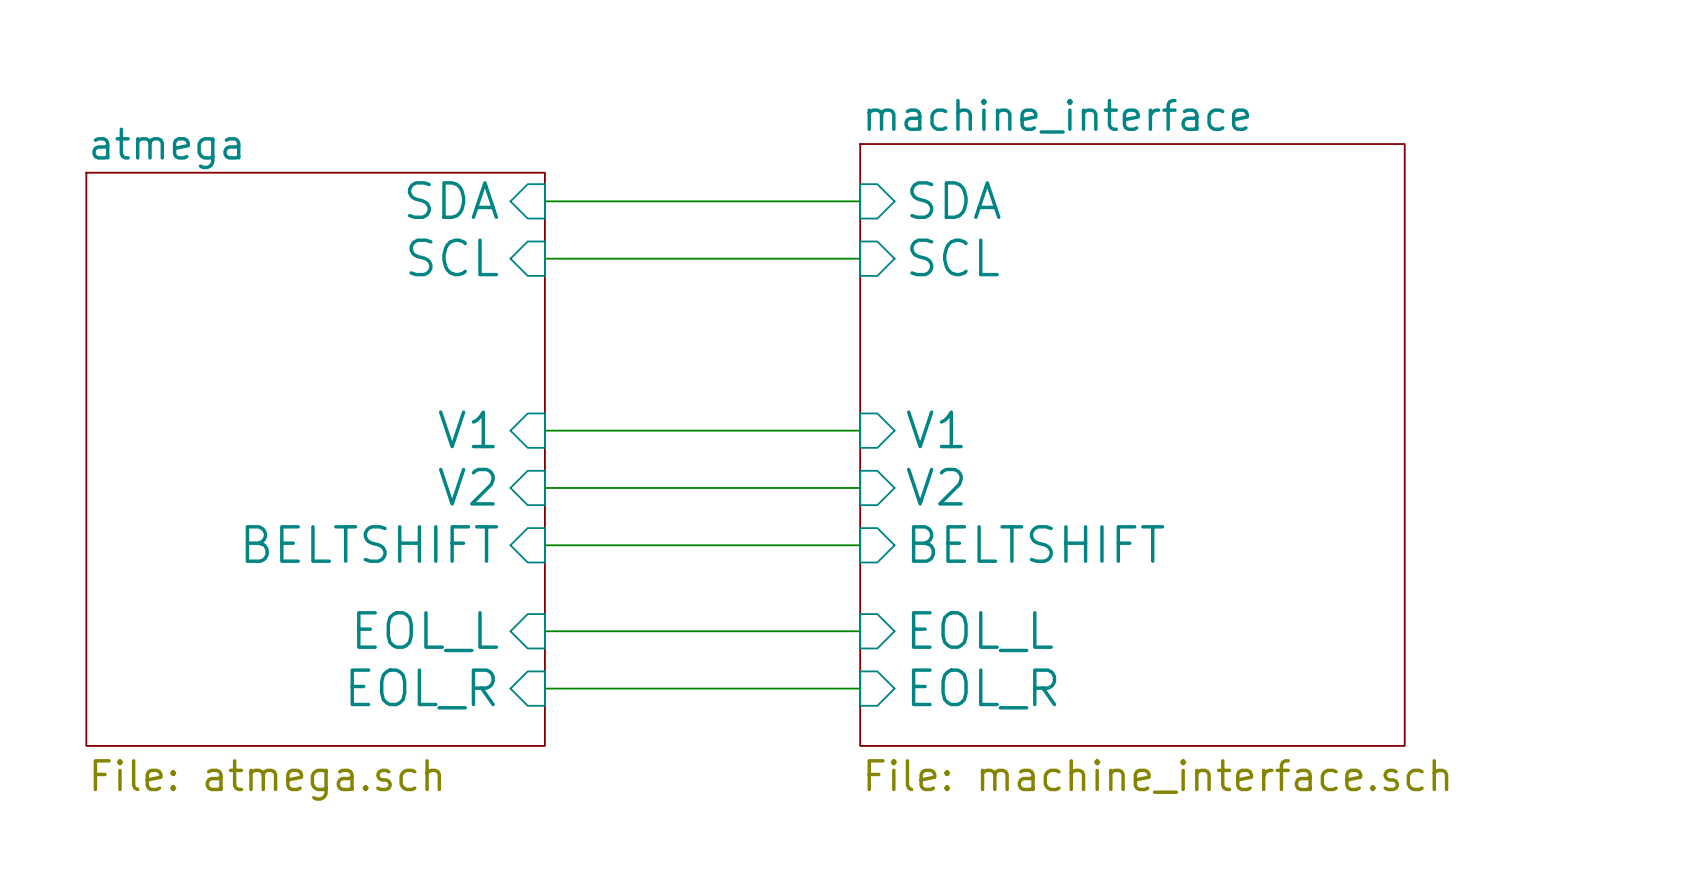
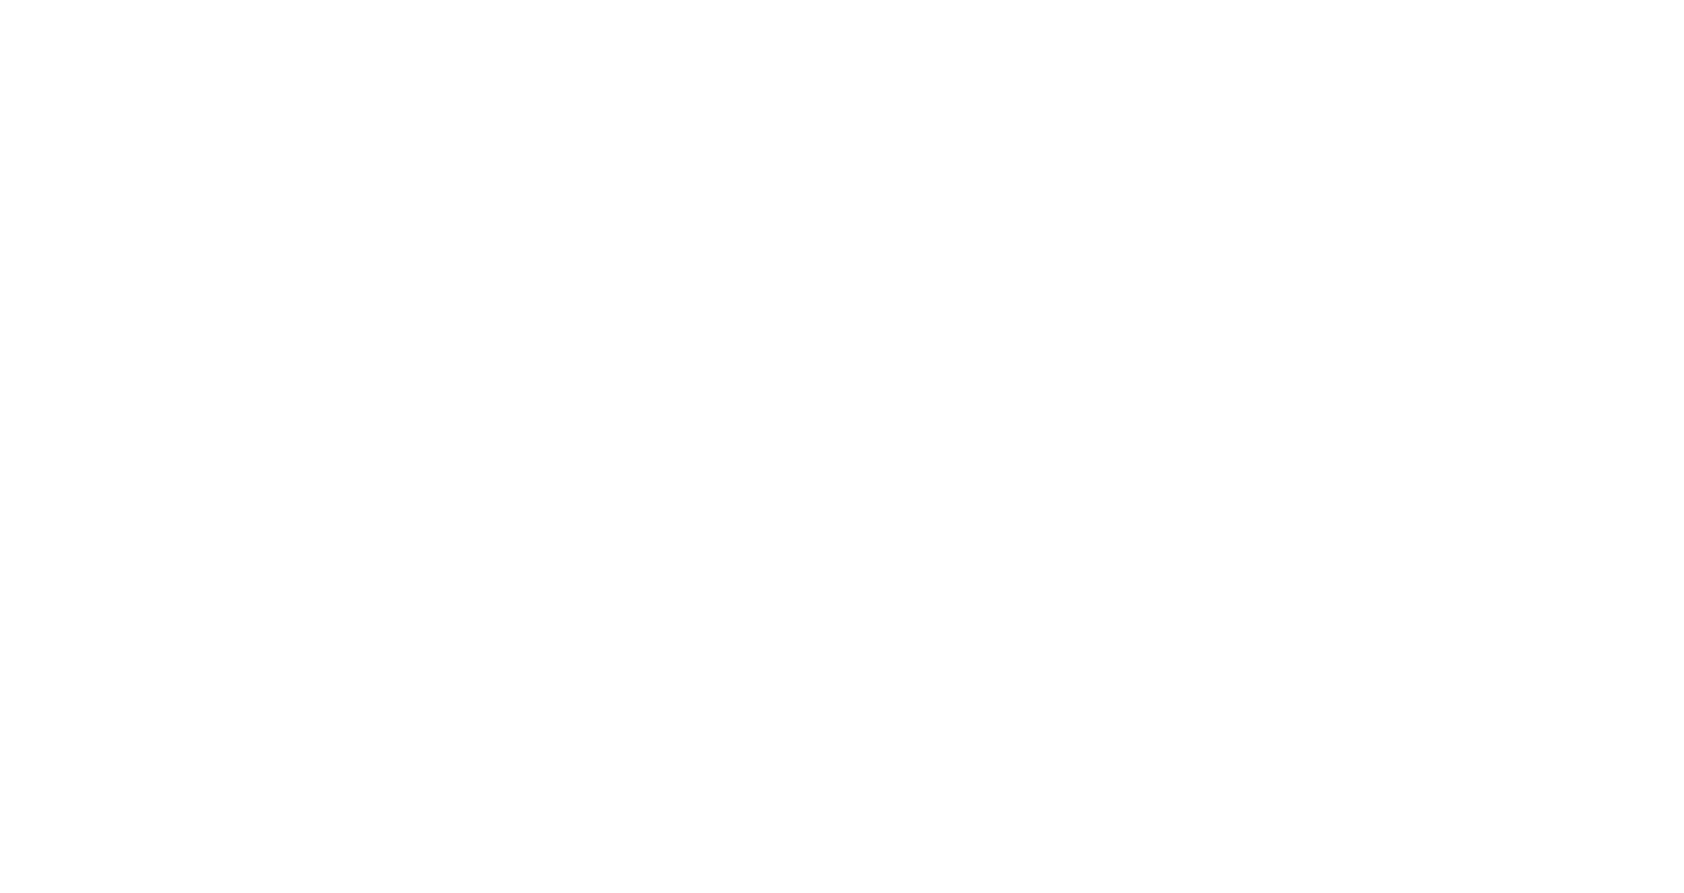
sheet pin: SDA (452, 200) -> none
sheet pin: SDA (955, 200) -> none
wire: (544, 201) (860, 201) -> none
sheet pin: SCL (453, 257) -> none
sheet pin: SCL (954, 257) -> none
wire: (544, 258) (860, 258) -> none
sheet pin: V1 (466, 429) -> none
sheet pin: V1 (934, 429) -> none
wire: (544, 430) (860, 430) -> none
sheet machine_interface: File: machine_interface.sch (1132, 444) -> none
sheet atmega: File: atmega.sch (315, 459) -> none
sheet pin: V2 (466, 486) -> none
sheet pin: V2 (934, 486) -> none
wire: (544, 487) (860, 487) -> none
sheet pin: BELTSHIFT (371, 544) -> none
sheet pin: BELTSHIFT (1038, 544) -> none
wire: (544, 545) (860, 545) -> none
sheet pin: EOL_L (427, 631) -> none
wire: (544, 631) (860, 631) -> none
sheet pin: EOL_L (982, 631) -> none
sheet pin: EOL_R (422, 688) -> none
wire: (544, 688) (860, 688) -> none
sheet pin: EOL_R (984, 688) -> none

